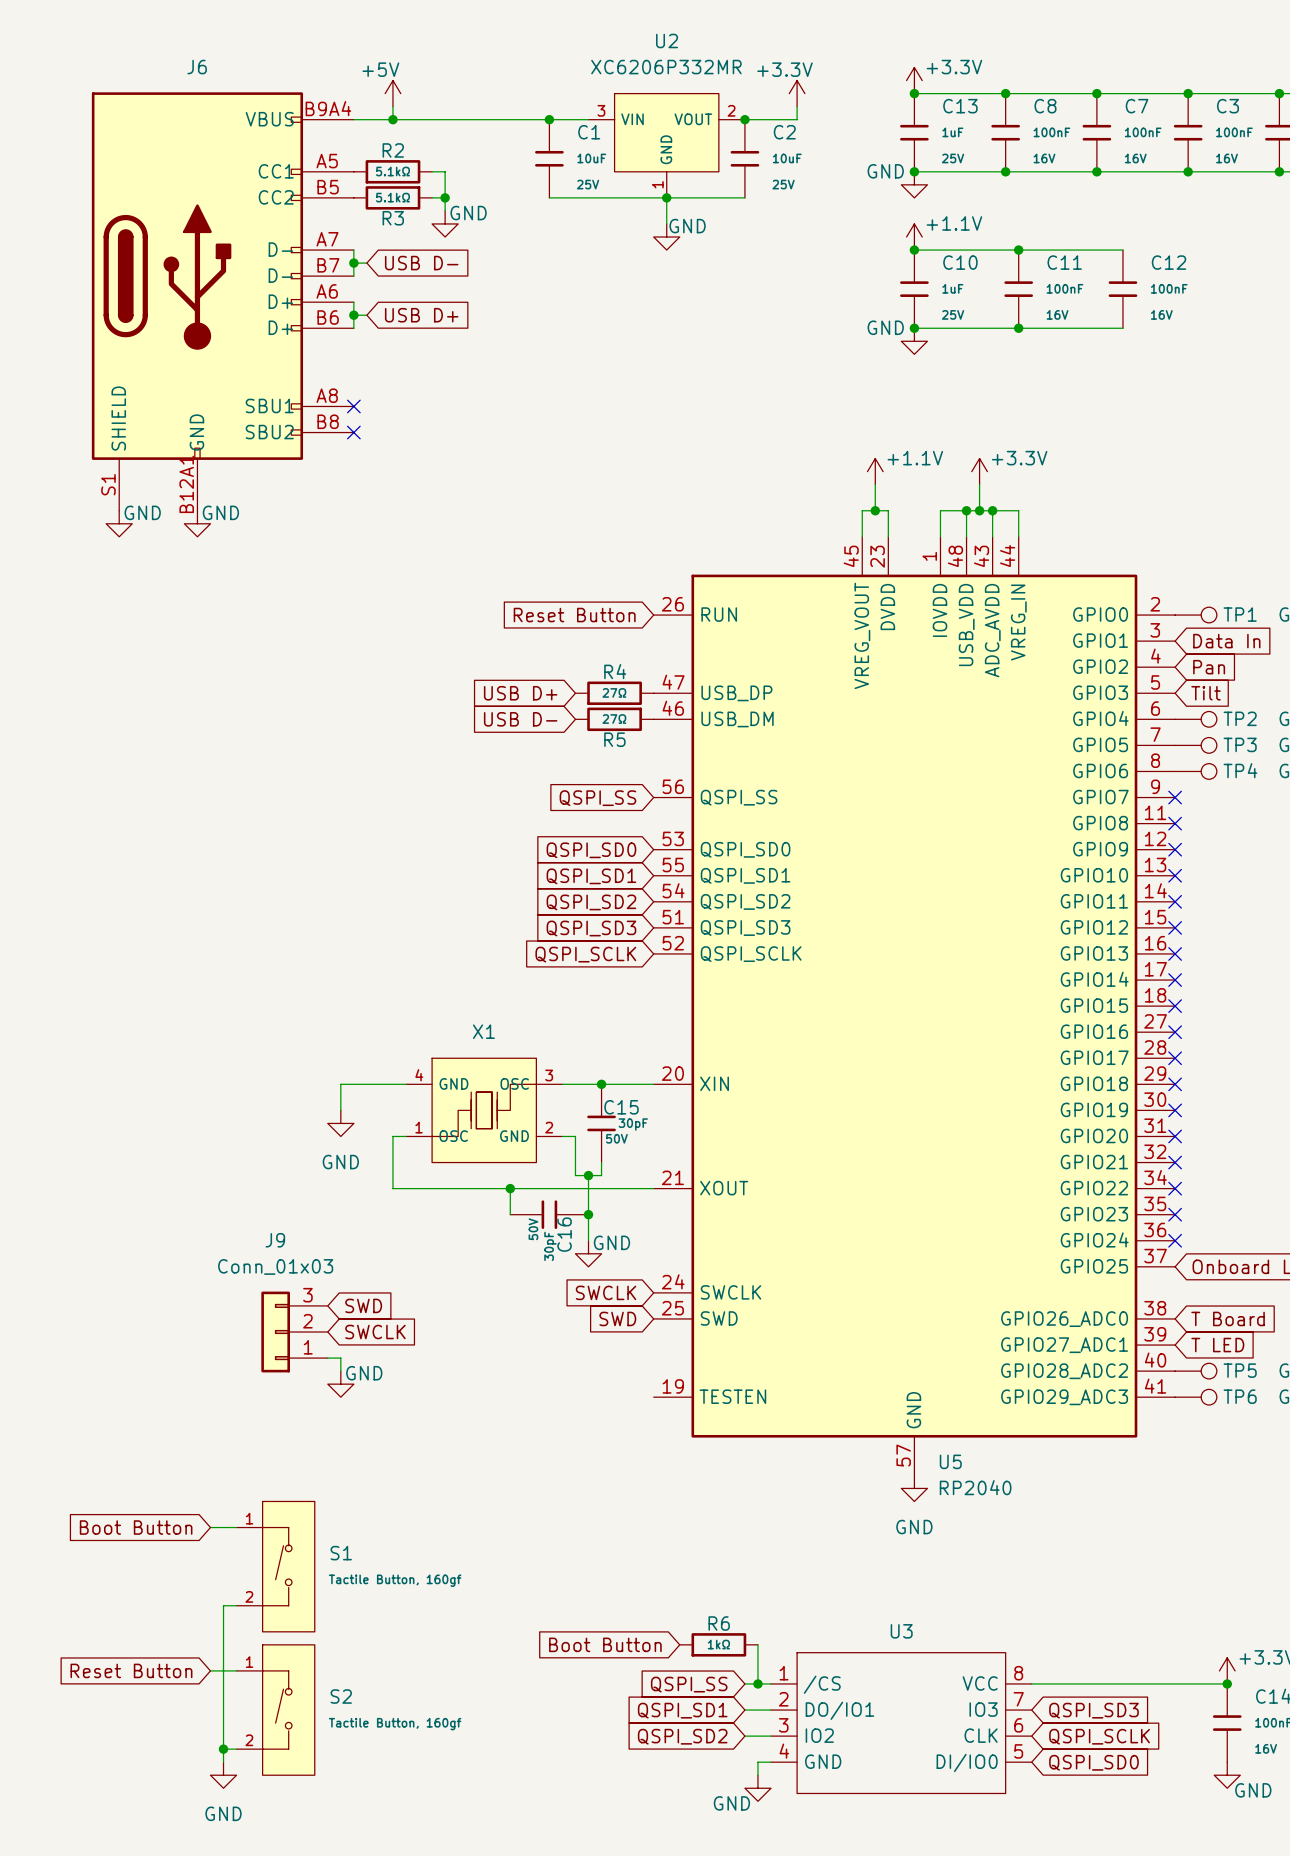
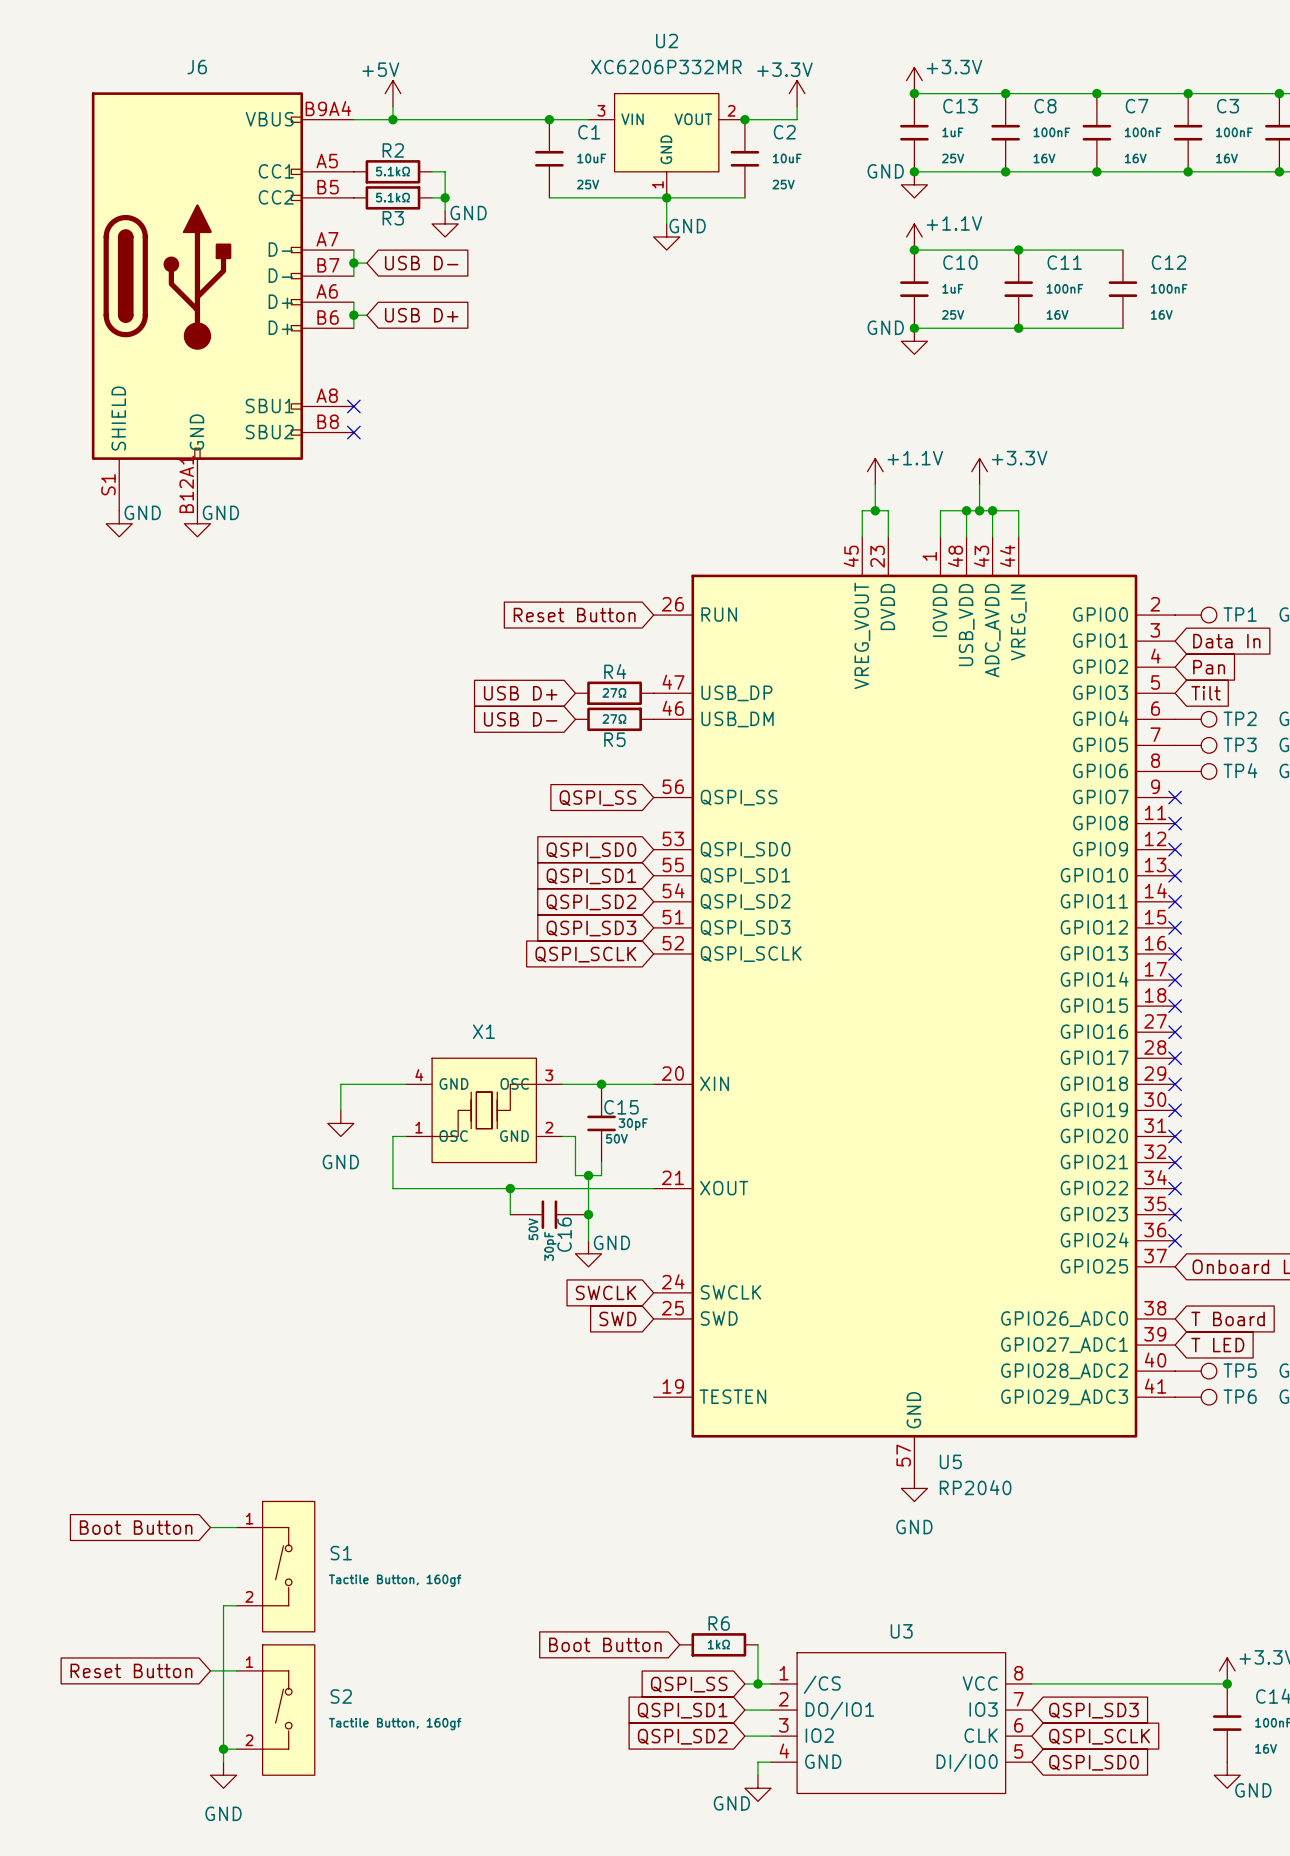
global label: SWD (363, 1305) -> none
J9: Conn_01x03 (294, 1332) -> none
global label: SWCLK (375, 1332) -> none
wire: (327, 1358) (340, 1358) (340, 1371) -> none
power symbol: GND (340, 1384) -> none

